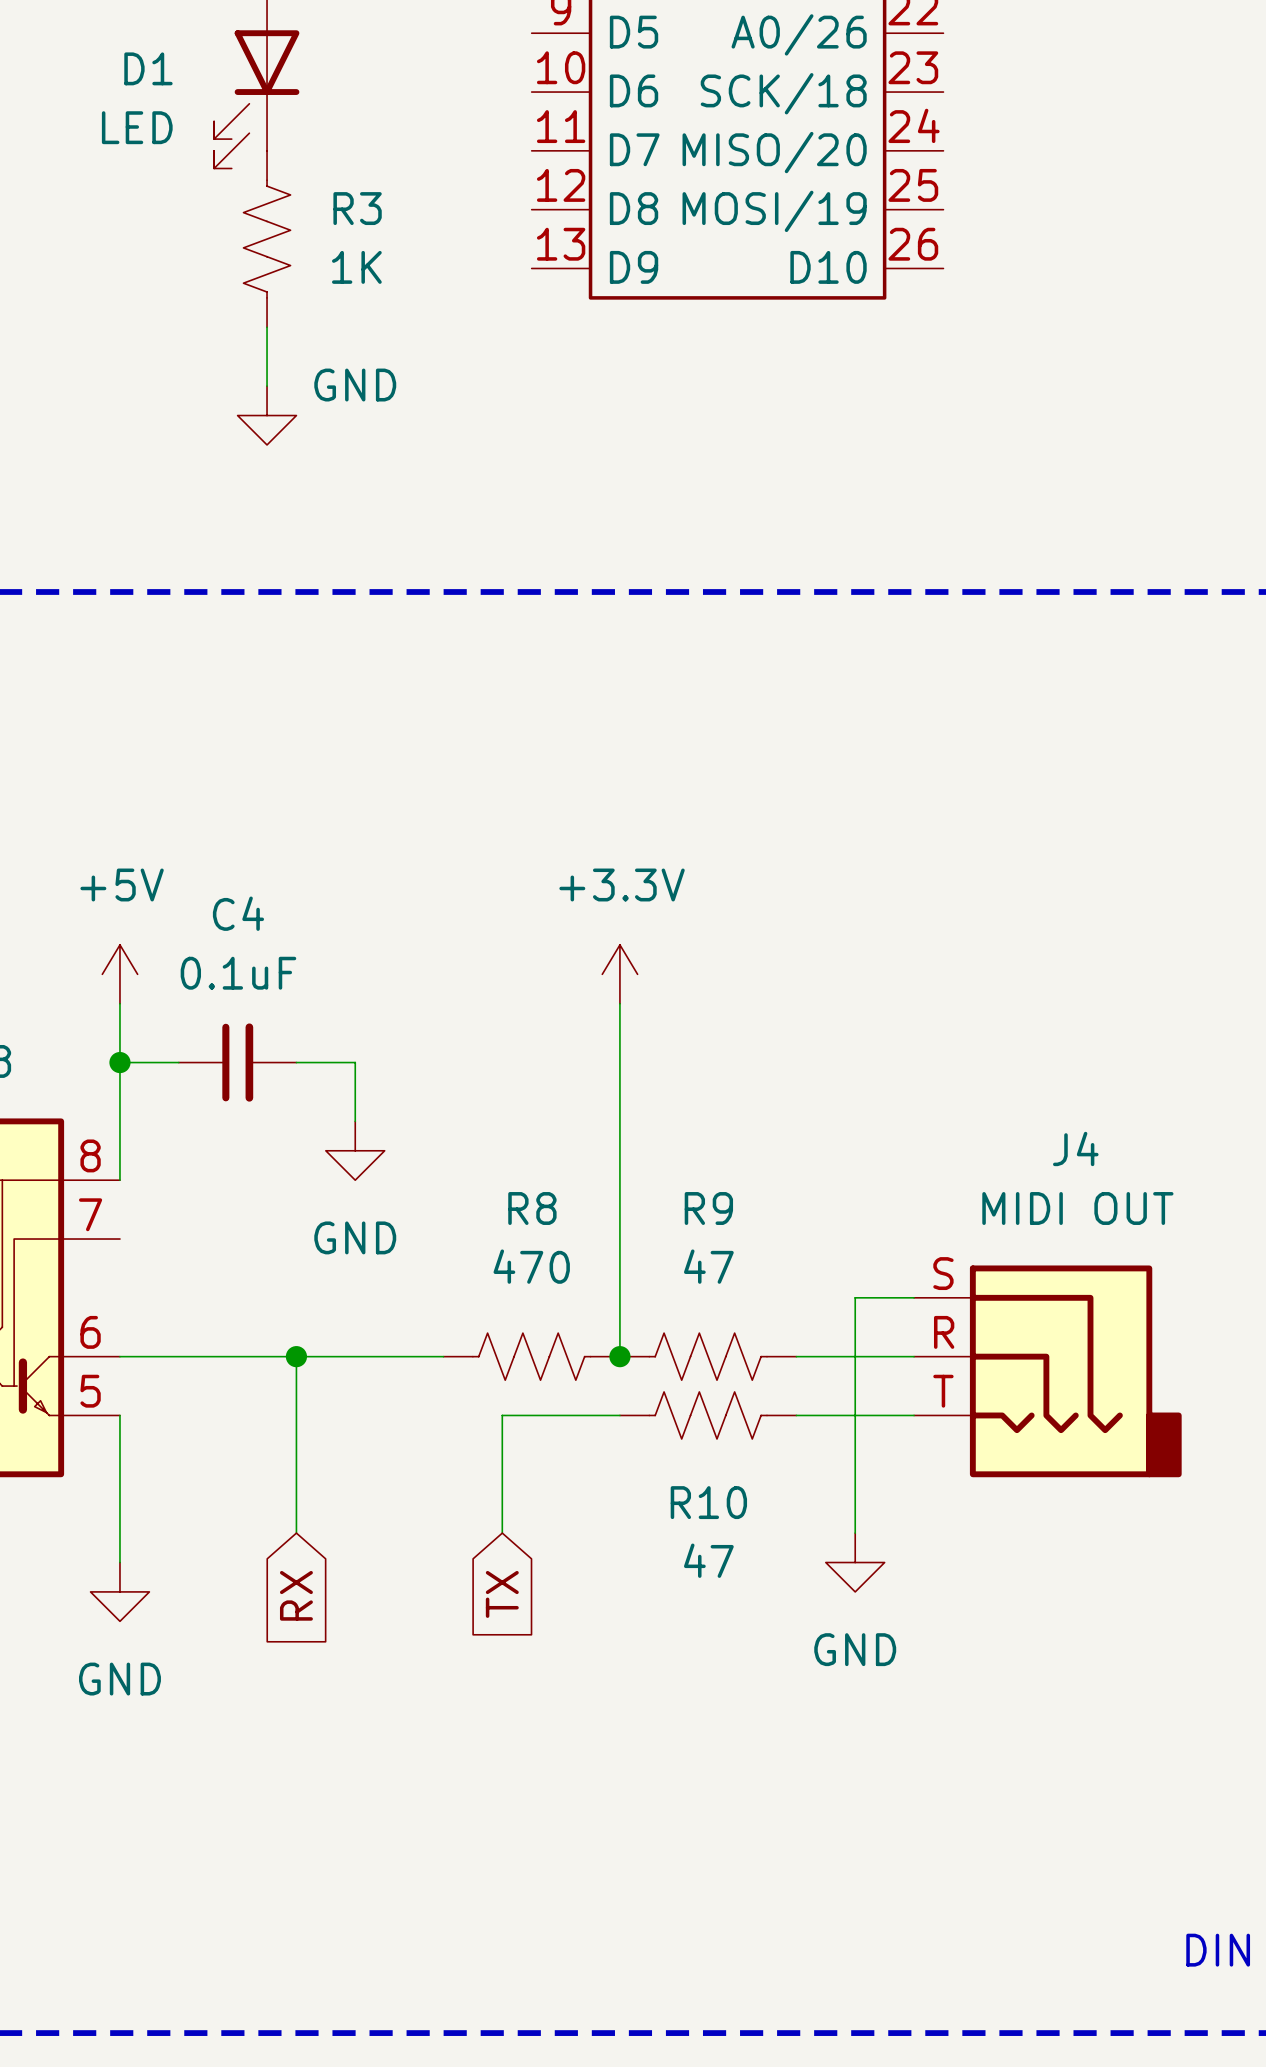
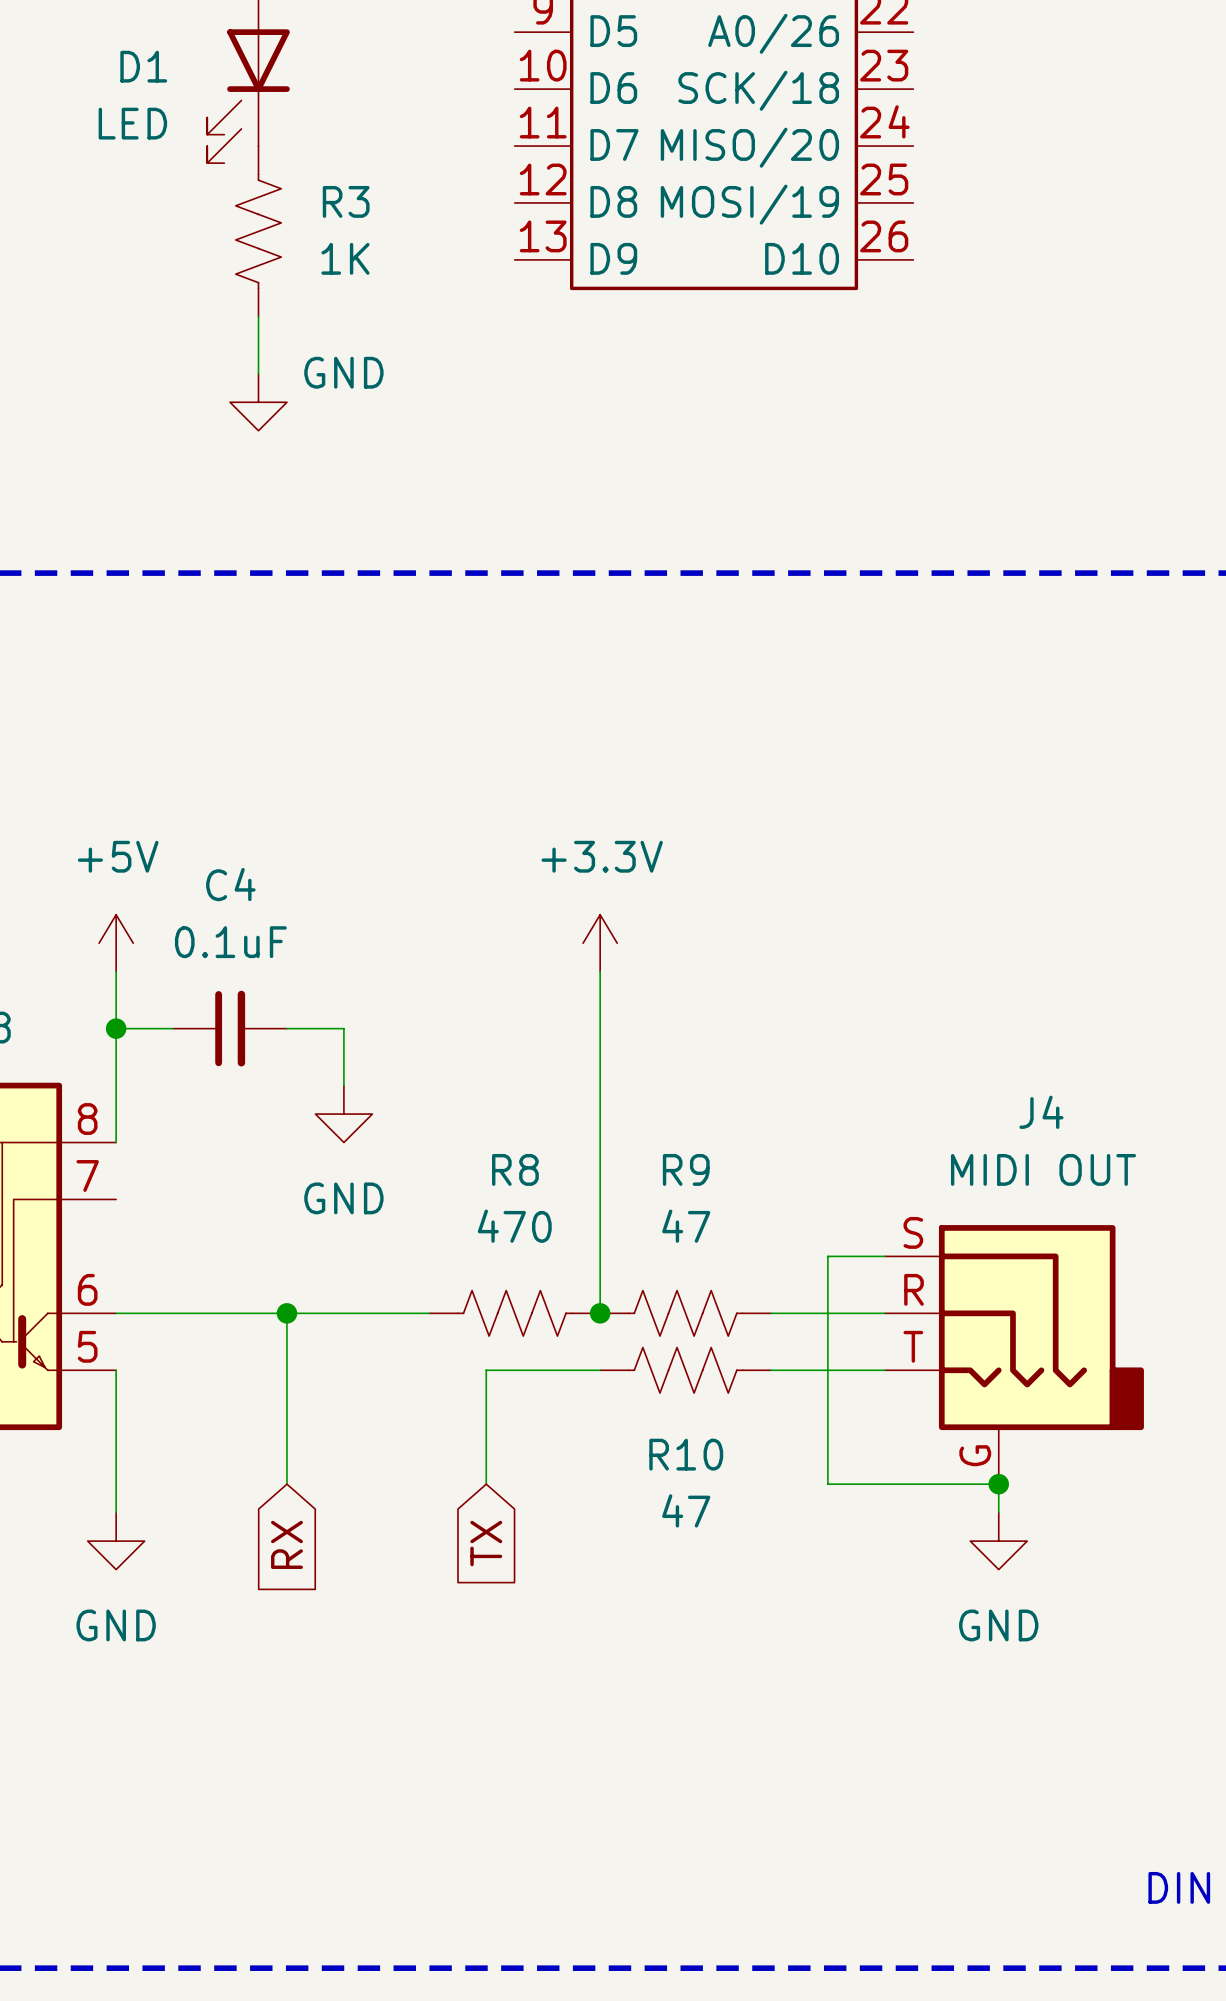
J4 symbol: [914, 1265, 1182, 1478] -> [884, 1225, 1144, 1485]
wire: none -> (827, 1484) (998, 1484) (998, 1512)
junction: none -> (998, 1484)
power symbol position: GND (855, 1562) -> GND (998, 1541)

